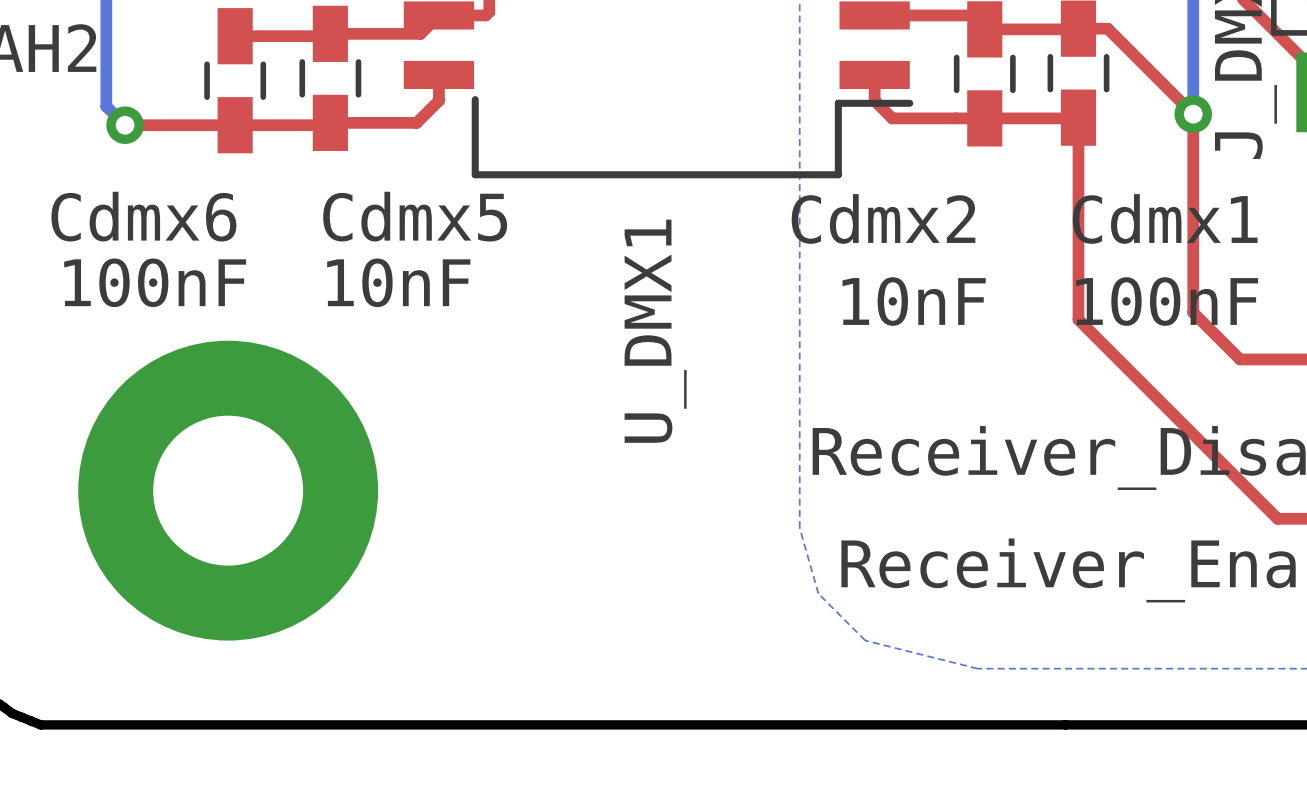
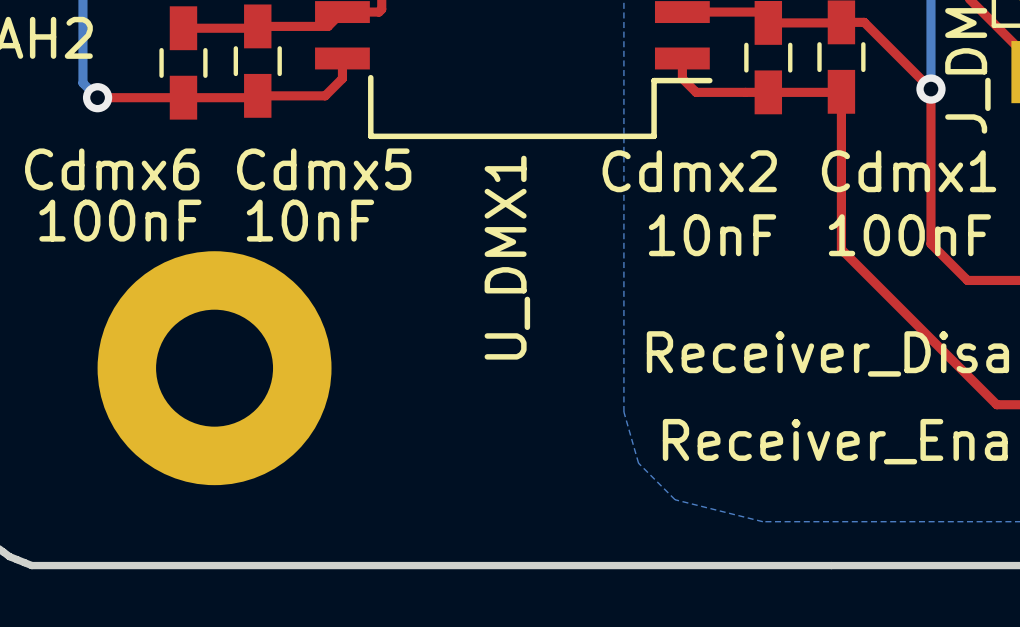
part position: (228, 490) -> (214, 368)

